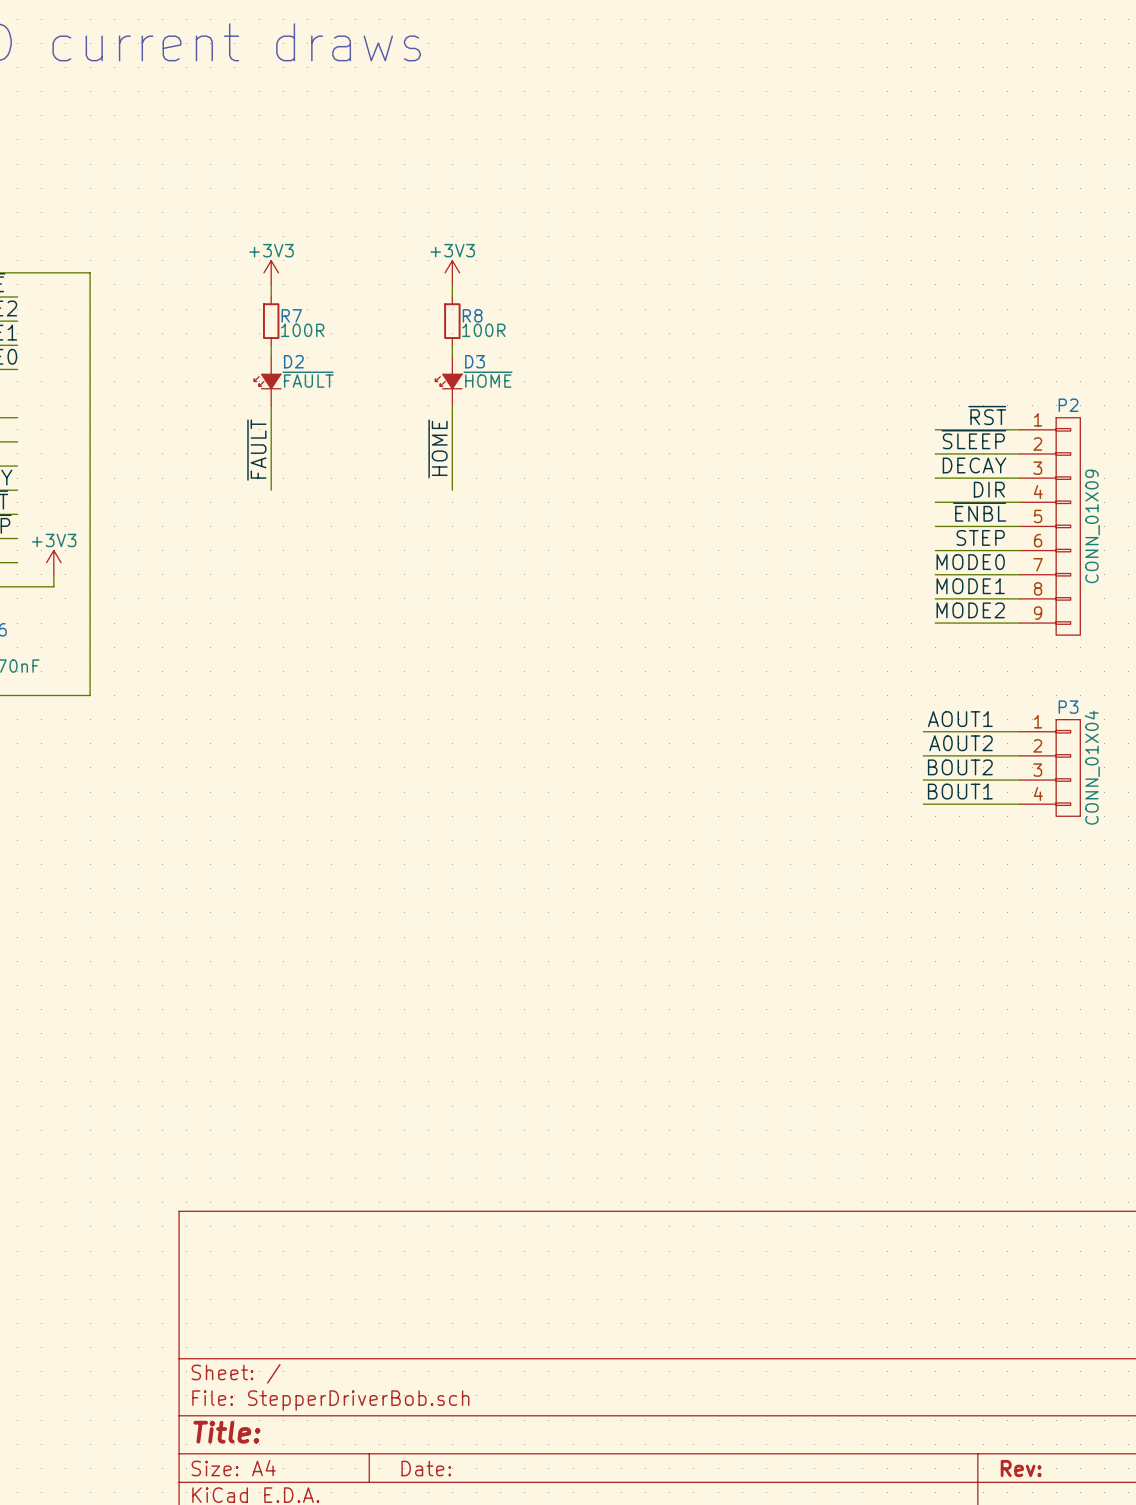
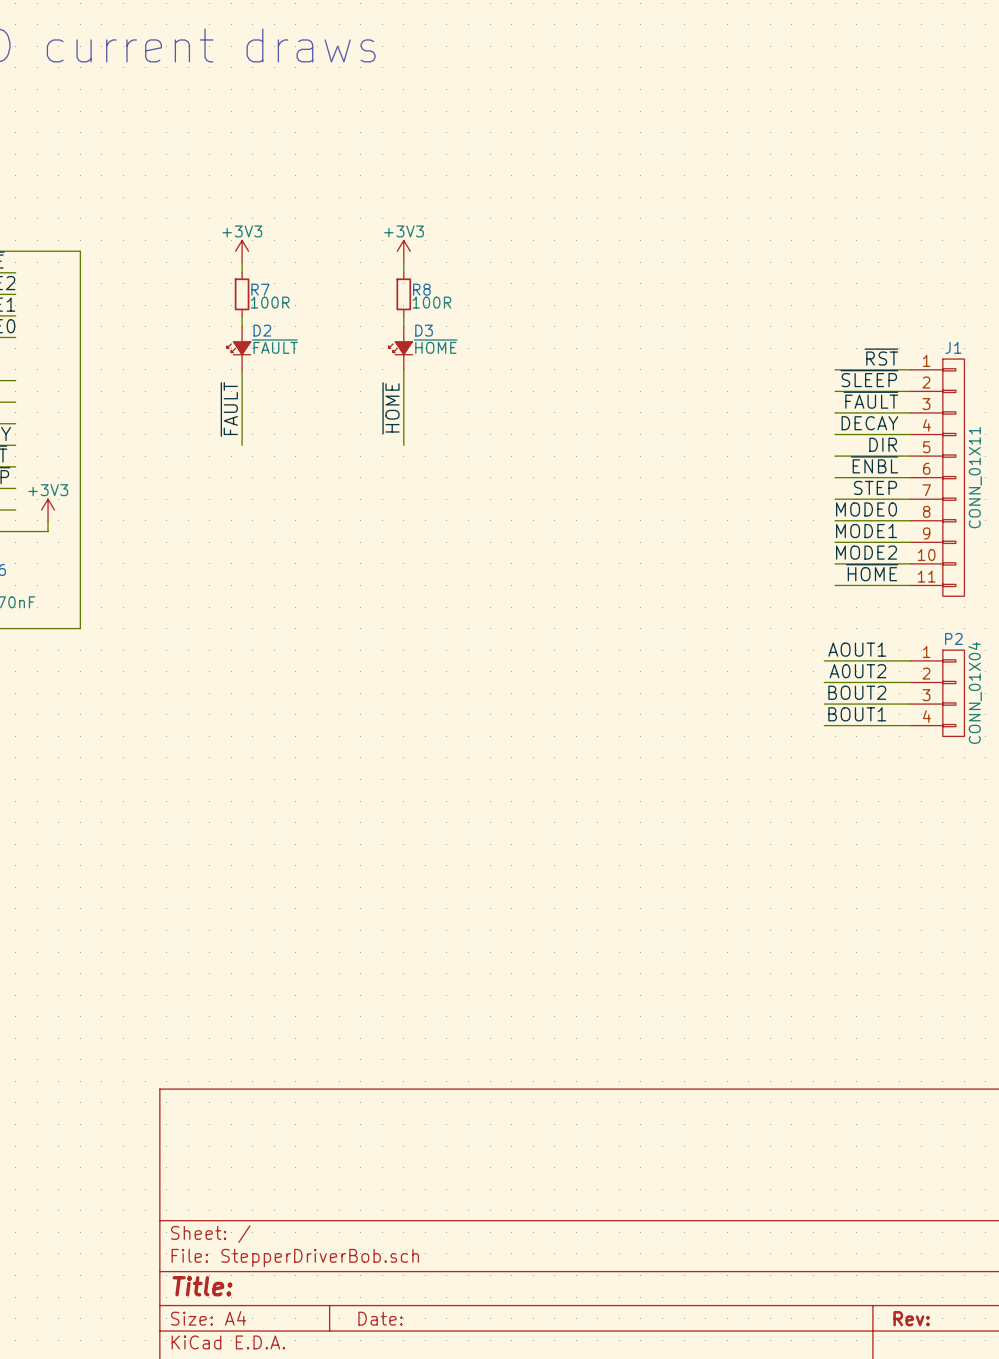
label: none -> ~{RST} (881, 357)
wire: none -> (835, 369) (910, 369)
label: ~{RST} (987, 415) -> ~{SLEEP} (869, 378)
label: ~{SLEEP} (973, 439) -> ~{FAULT} (870, 400)
P2: CONN_01X09 (1050, 526) -> none
J1: none -> CONN_01X11 (937, 477)
label: none -> ~{HOME} (872, 572)
wire: none -> (835, 585) (910, 585)
P3 name: P3 (1068, 707) -> P2 (953, 638)

